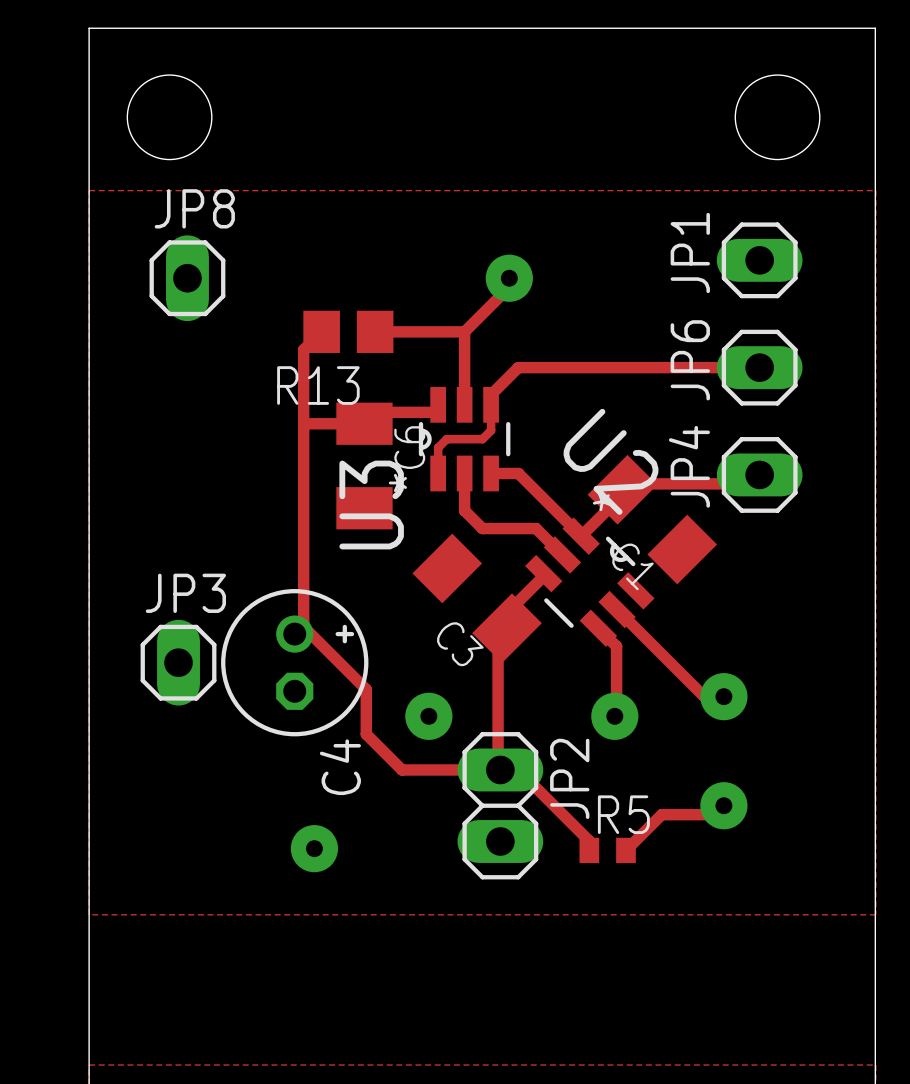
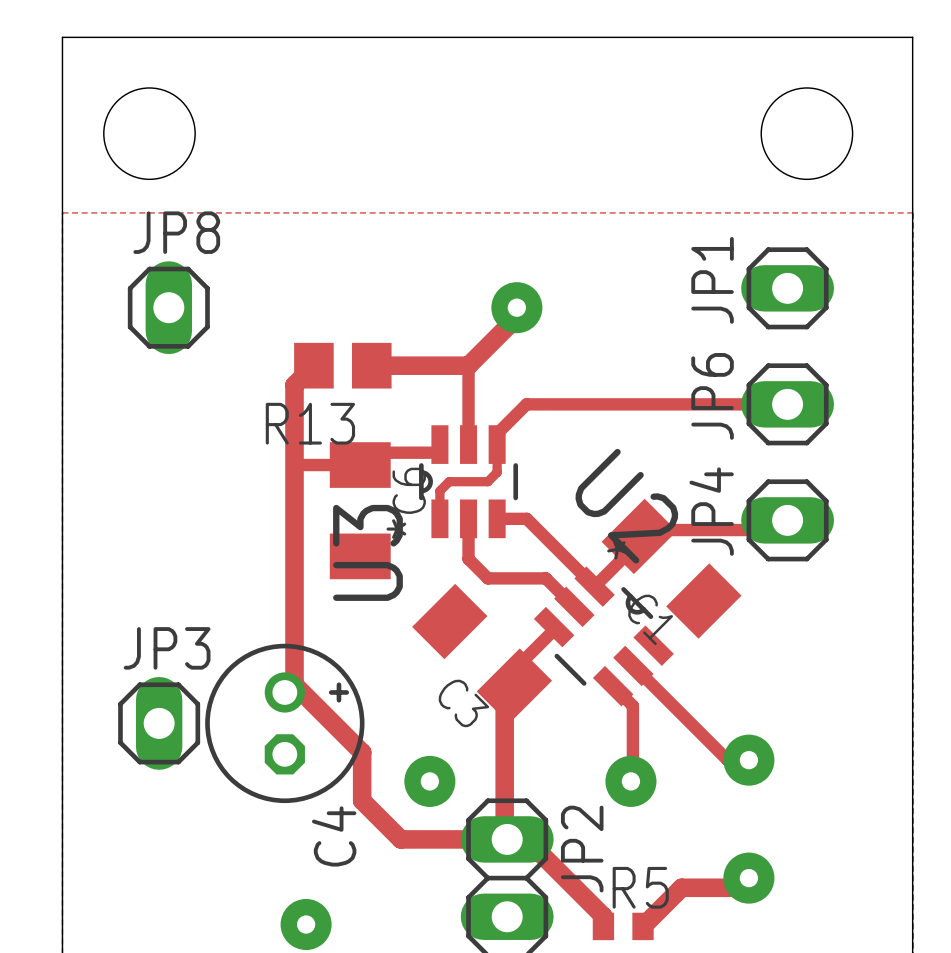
track width: thin (509, 287) (464, 331) (375, 331) -> thick (516, 317) (468, 365) (371, 365)
track width: thin (321, 331) (303, 349) (303, 625) (294, 634) (301, 625) (366, 689) (366, 734) (402, 769) (518, 769) (589, 841) (589, 850) -> thick (313, 365) (294, 385) (294, 682) (284, 692) (292, 682) (362, 752) (362, 800) (400, 839) (526, 839) (603, 916) (603, 926)
track width: thin (507, 613) (507, 628) (498, 638) (498, 767) (500, 769) -> thick (514, 669) (514, 686) (504, 696) (504, 836) (507, 839)
track width: thin (723, 805) (714, 814) (661, 814) (625, 850) -> thick (748, 878) (739, 887) (681, 887) (643, 926)

